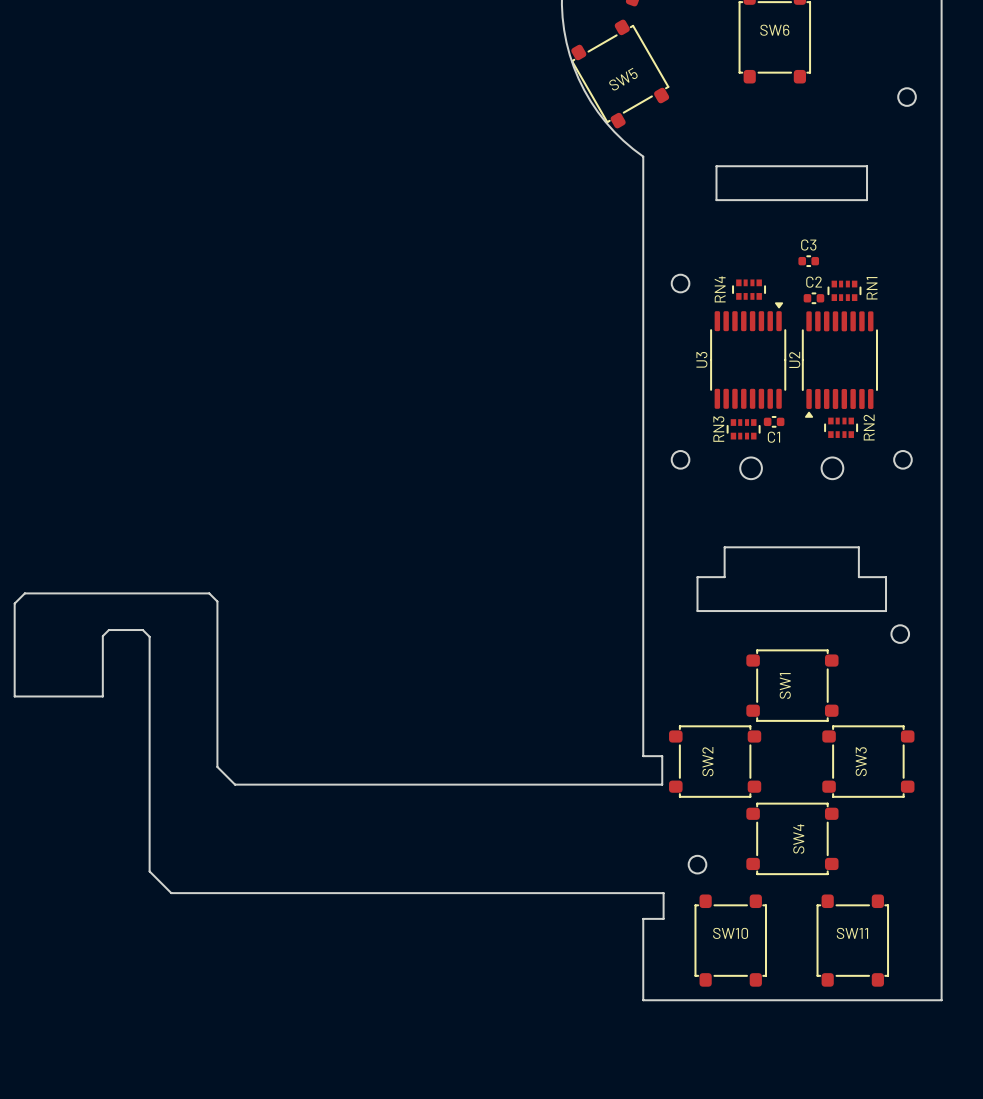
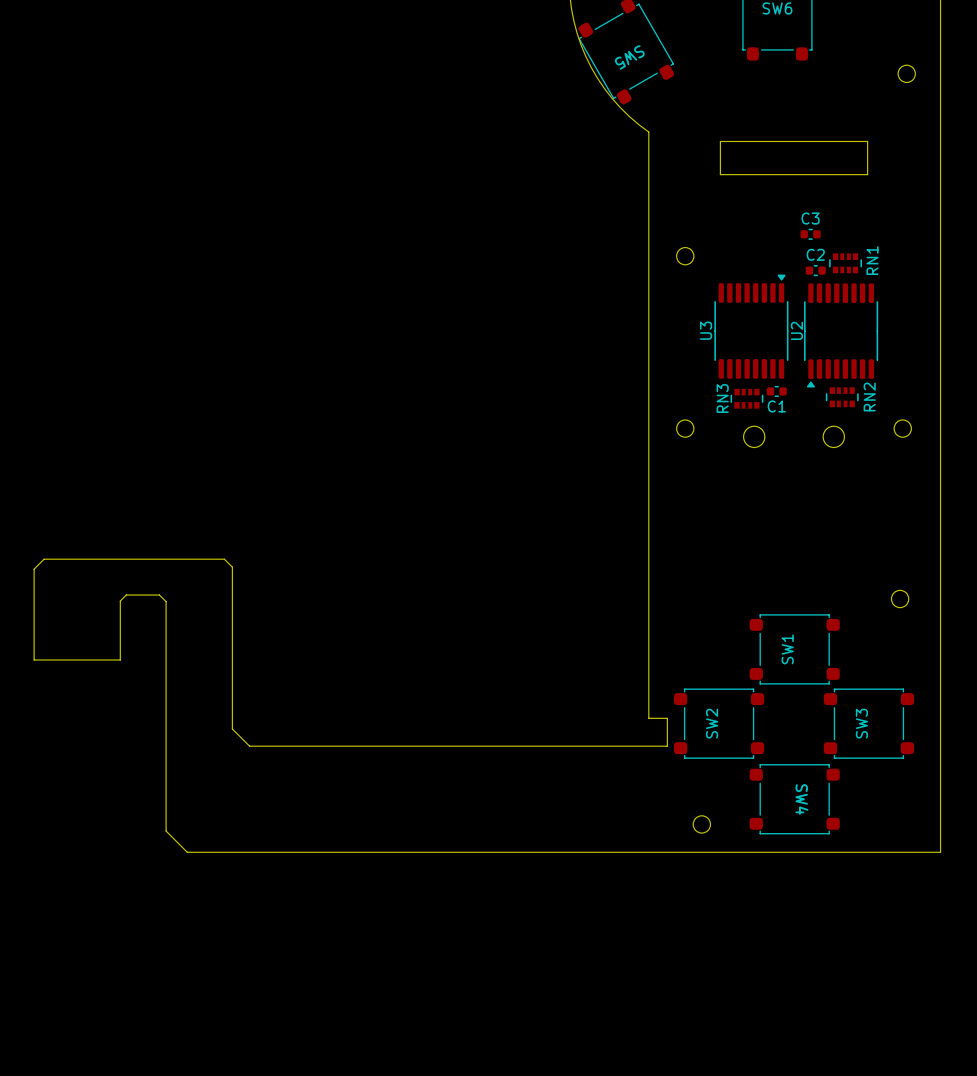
SW5 name rotation: 0° (623, 79) -> 180° (629, 57)
RN4: (749, 289) -> none
board edge: (724, 547) (724, 577) (697, 577) (697, 611) (886, 611) (886, 577) (858, 577) (858, 547) (724, 547) -> none
SW4 name rotation: 0° (798, 838) -> 180° (801, 799)
board edge: (663, 893) (663, 918) (643, 918) (643, 1000) (941, 1000) (941, 893) -> (668, 852) (940, 852)
SW10: (730, 940) -> none
SW11: (852, 940) -> none

